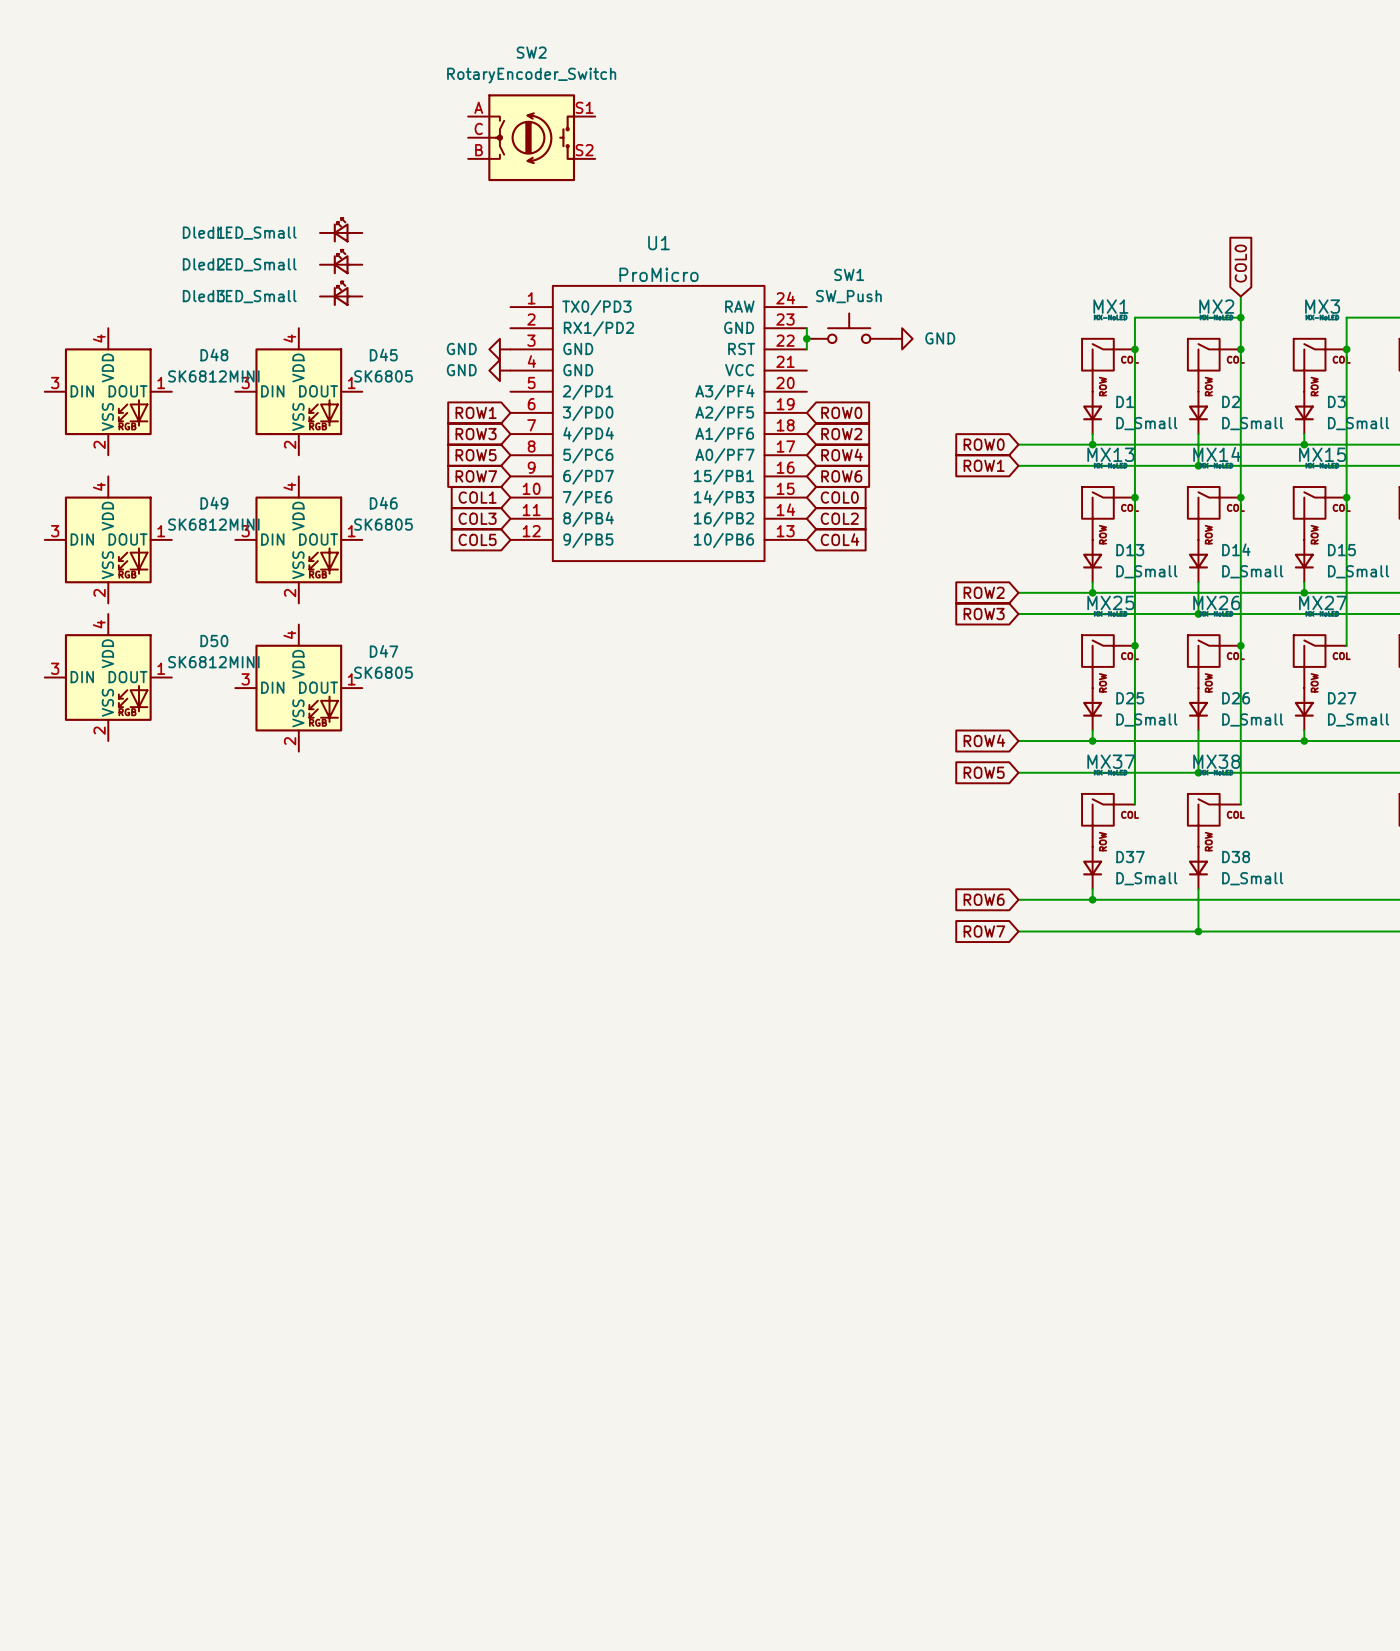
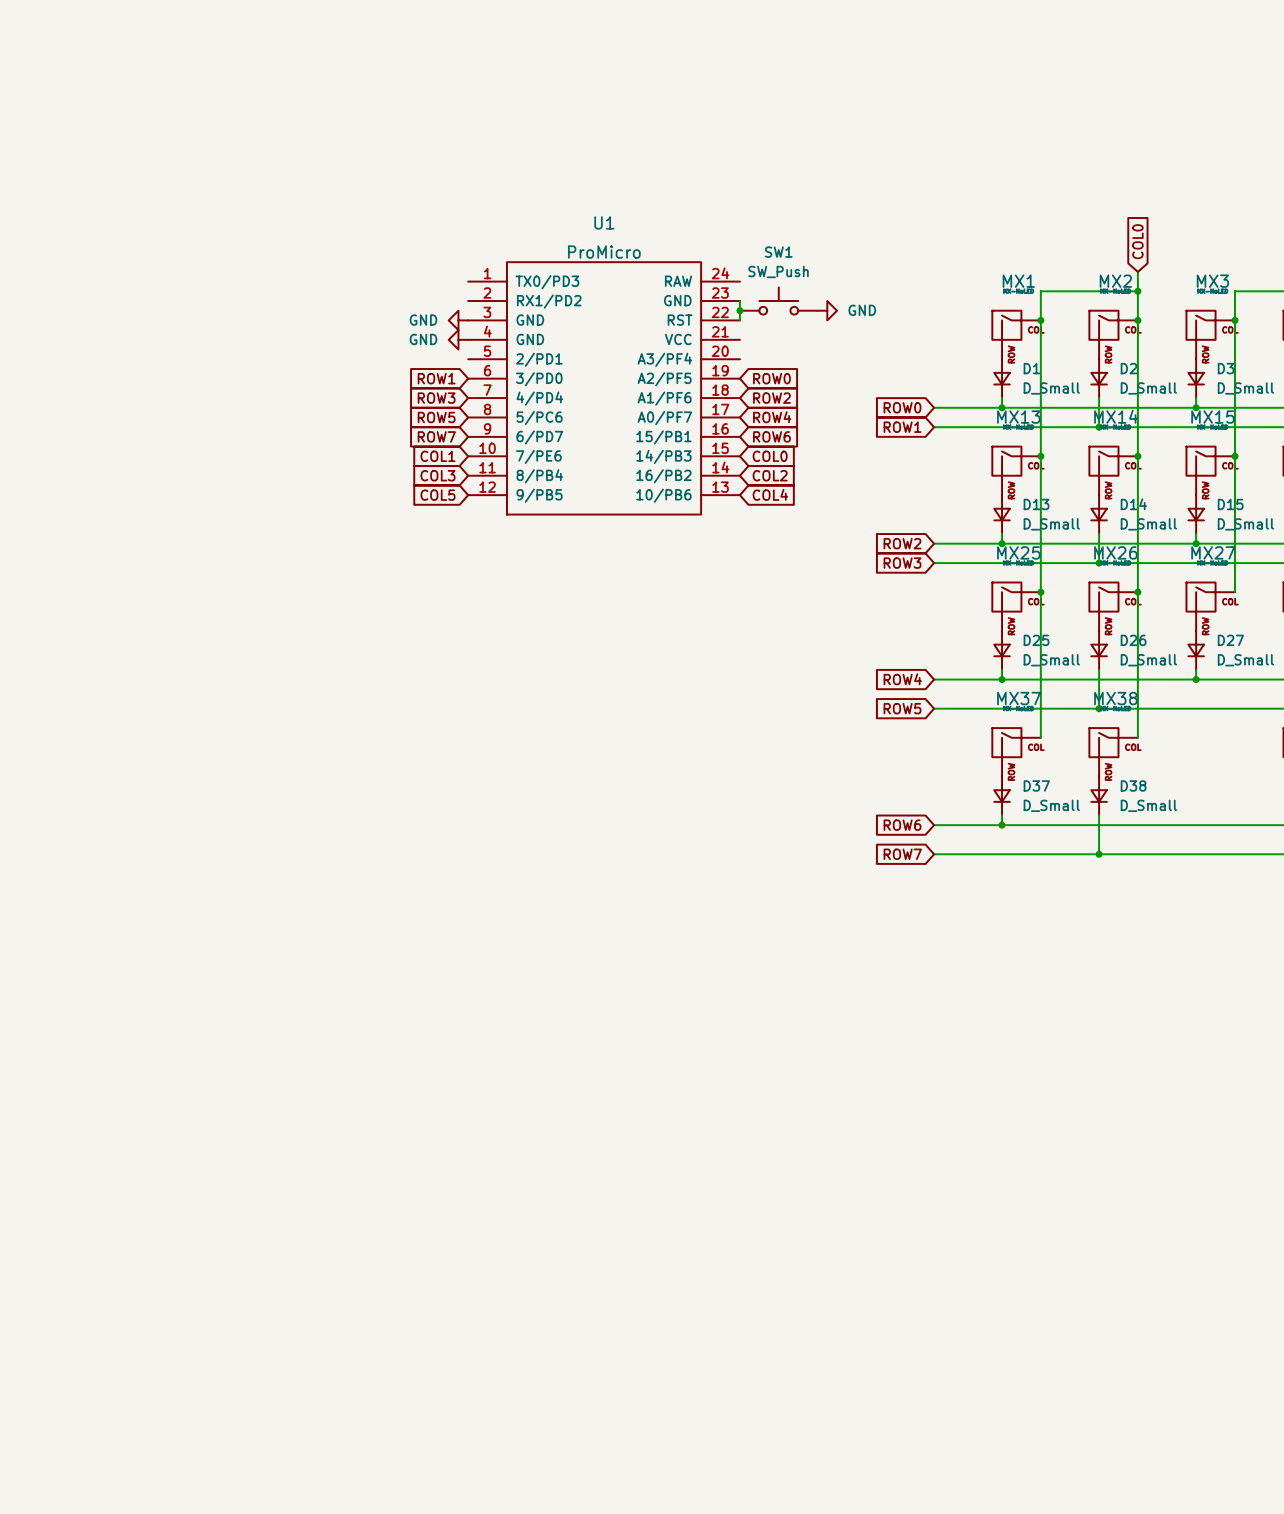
SW2: RotaryEncoder_Switch (531, 137) -> none
Dled1: LED_Small (341, 230) -> none
Dled2: LED_Small (341, 262) -> none
Dled3: LED_Small (341, 293) -> none
D48: SK6812MINI (108, 391) -> none
D45: SK6805 (298, 391) -> none
D49: SK6812MINI (108, 539) -> none
D46: SK6805 (298, 539) -> none
D50: SK6812MINI (108, 677) -> none
D47: SK6805 (298, 688) -> none

